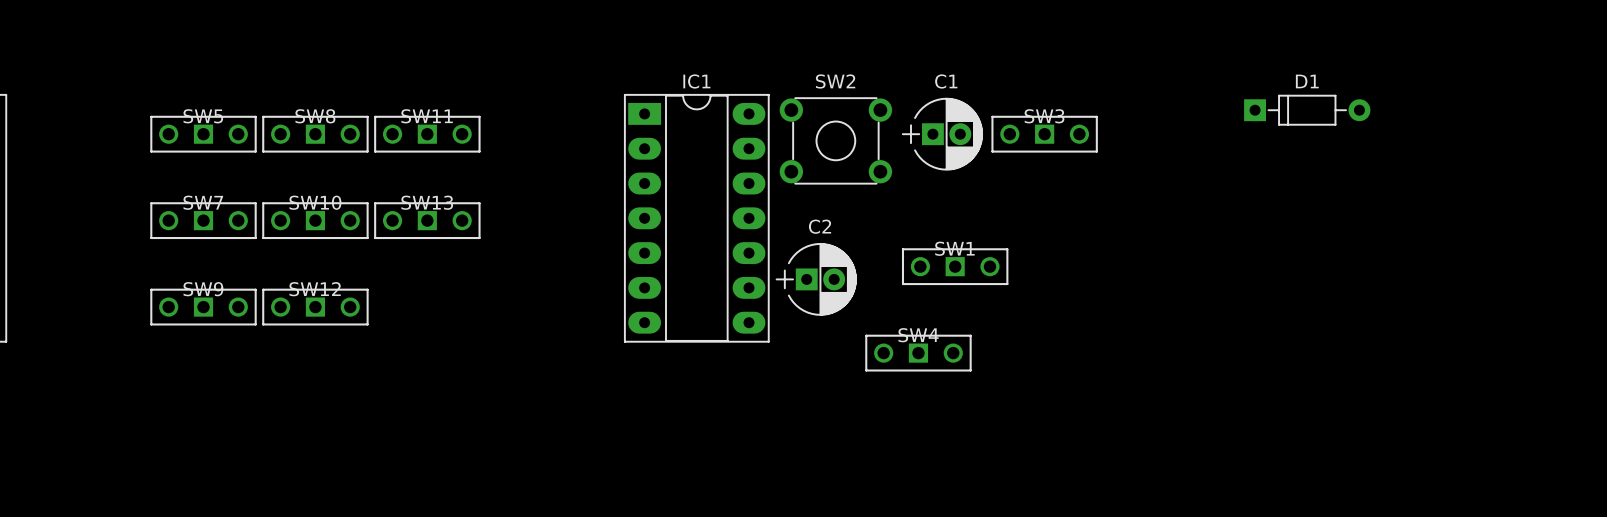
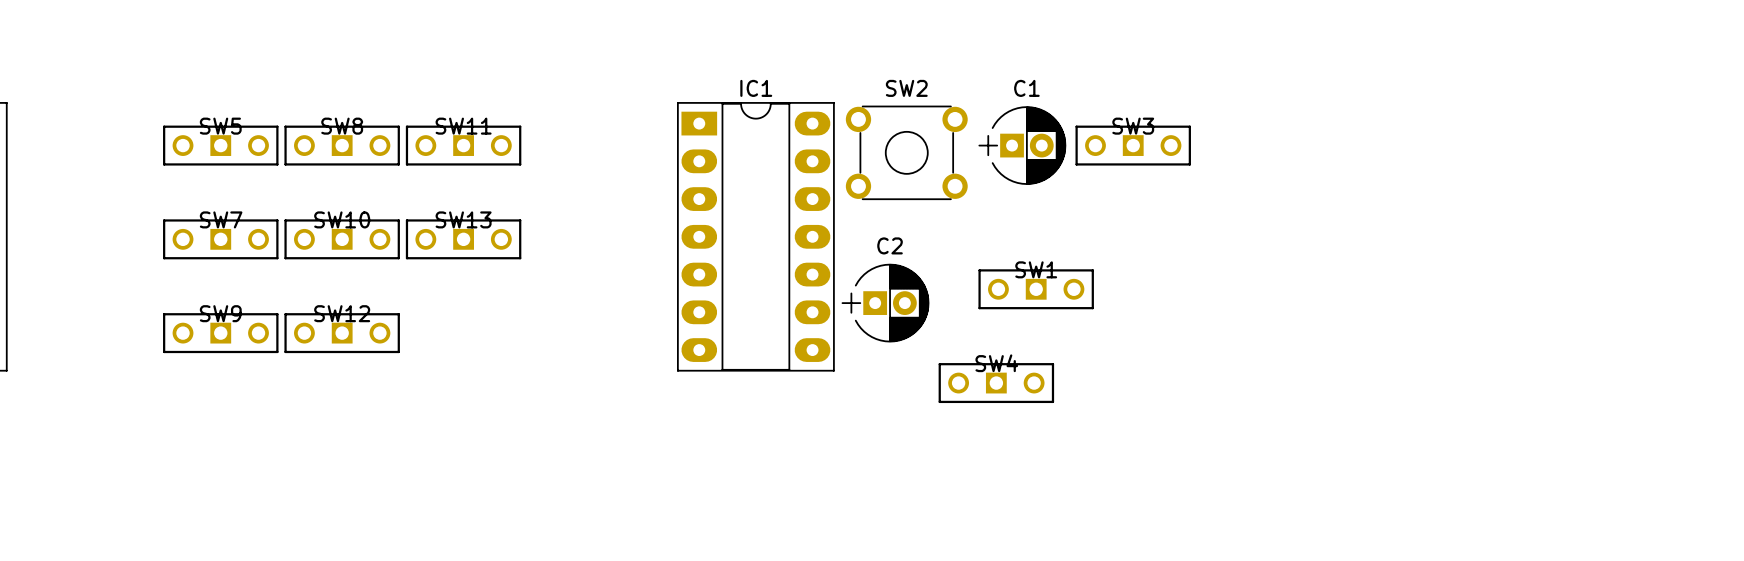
D1: (1307, 110) -> none

